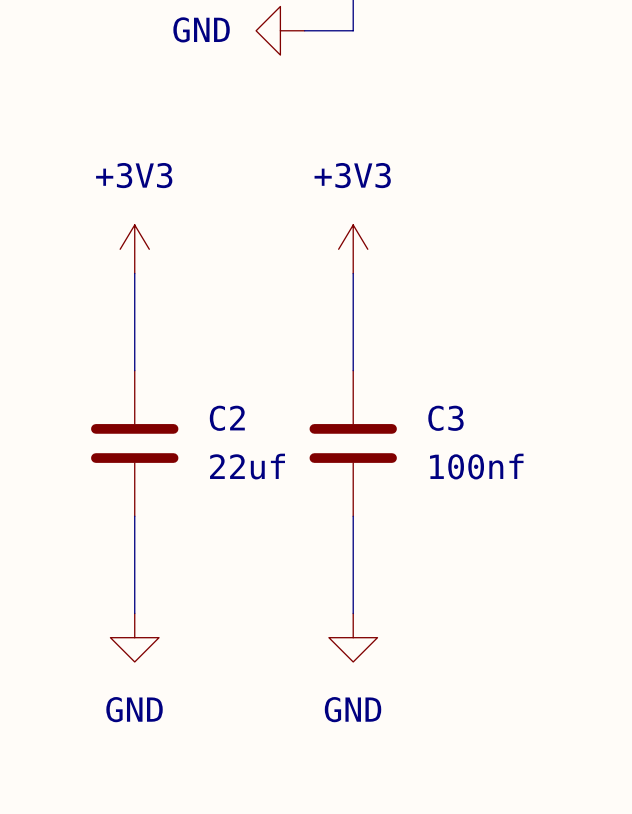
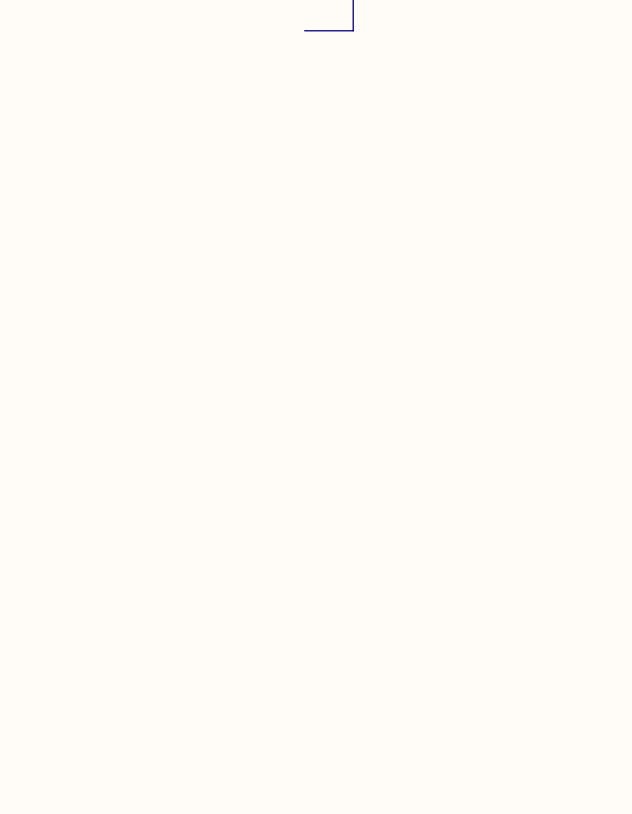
power symbol: GND (280, 30) -> none
power symbol: +3V3 (134, 249) -> none
power symbol: +3V3 (353, 249) -> none
wire: (134, 273) (134, 370) -> none
wire: (353, 273) (353, 370) -> none
C2: 22uf (134, 443) -> none
C3: 100nf (353, 443) -> none
wire: (134, 516) (134, 613) -> none
wire: (353, 516) (353, 613) -> none
power symbol: GND (134, 637) -> none
power symbol: GND (353, 637) -> none

